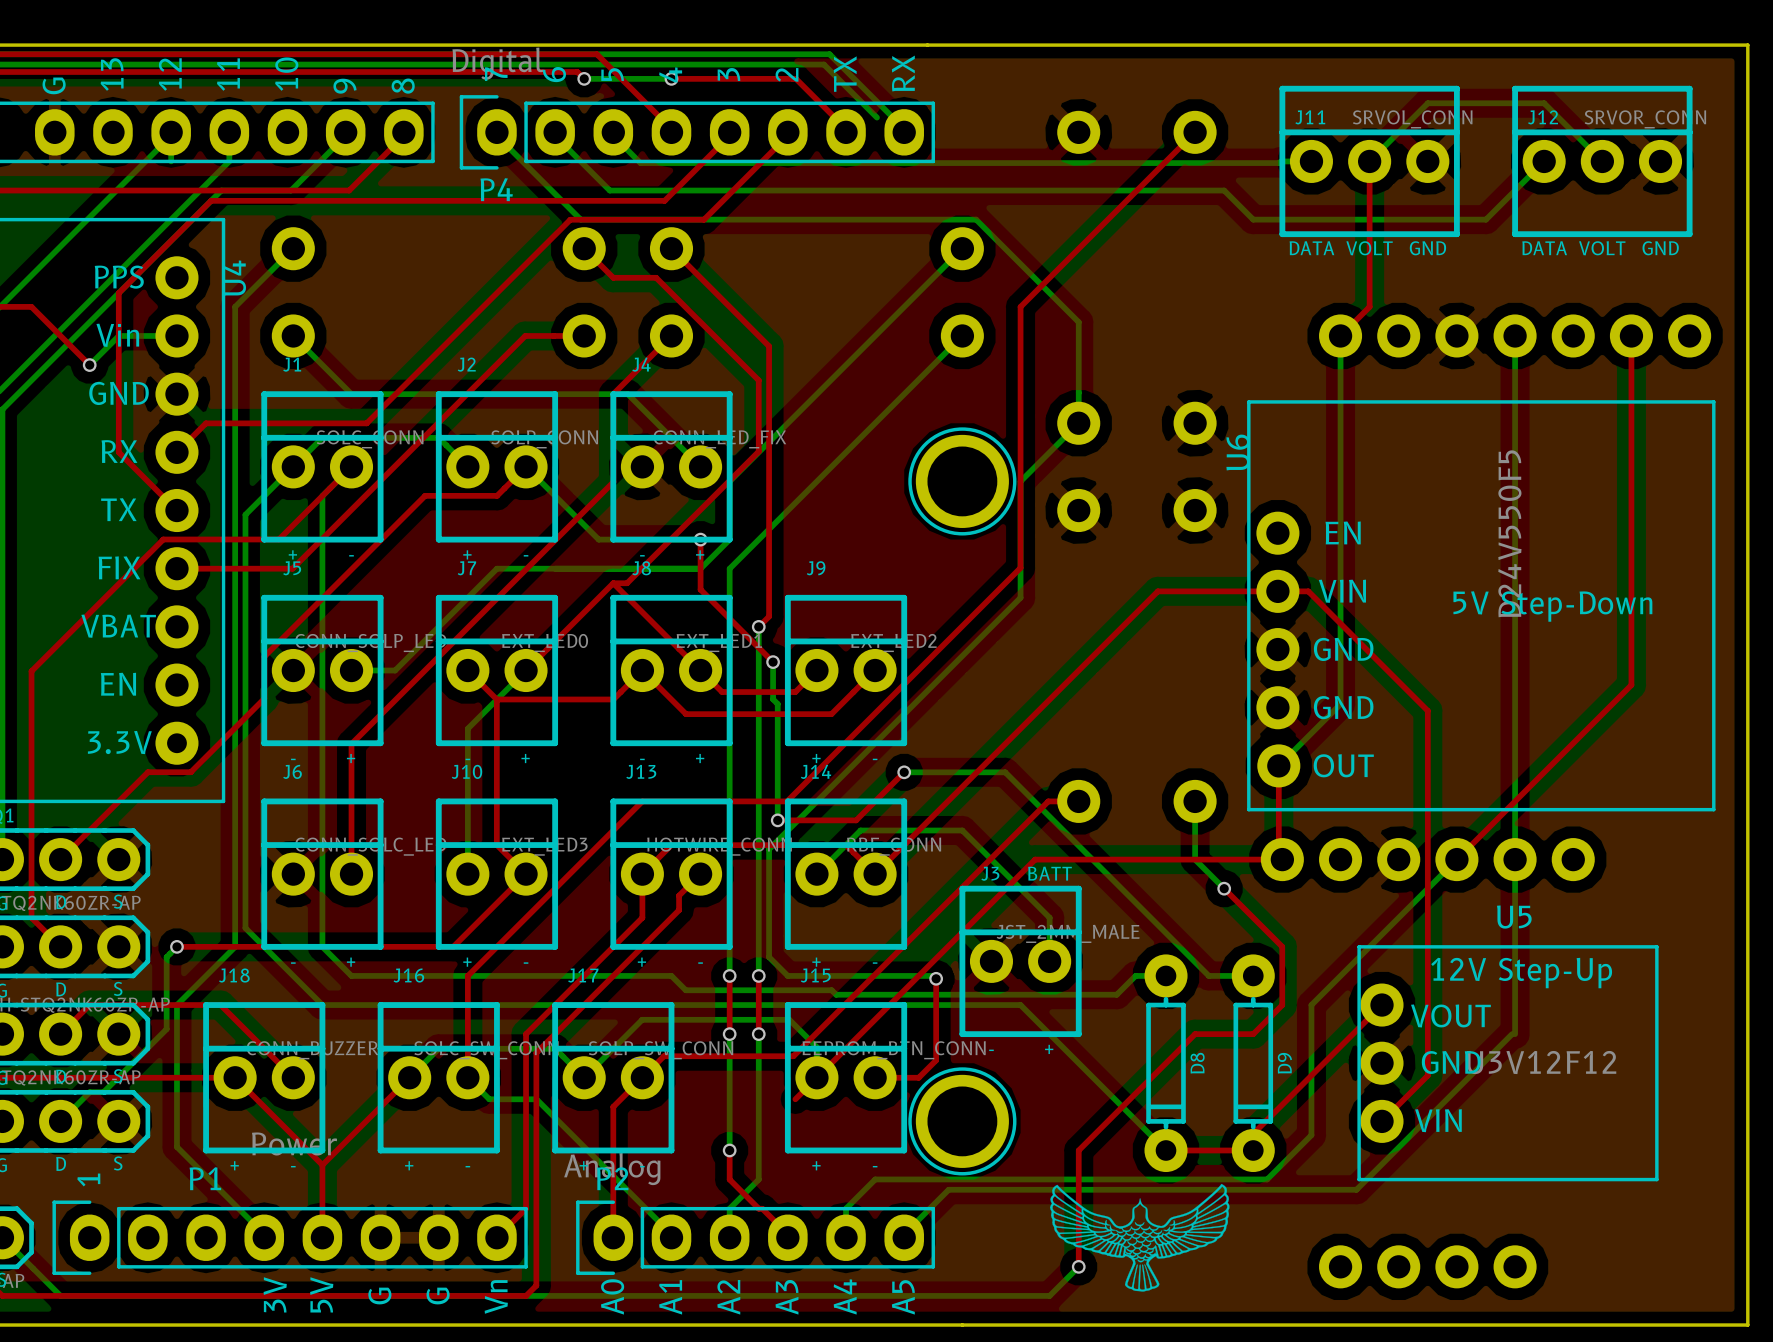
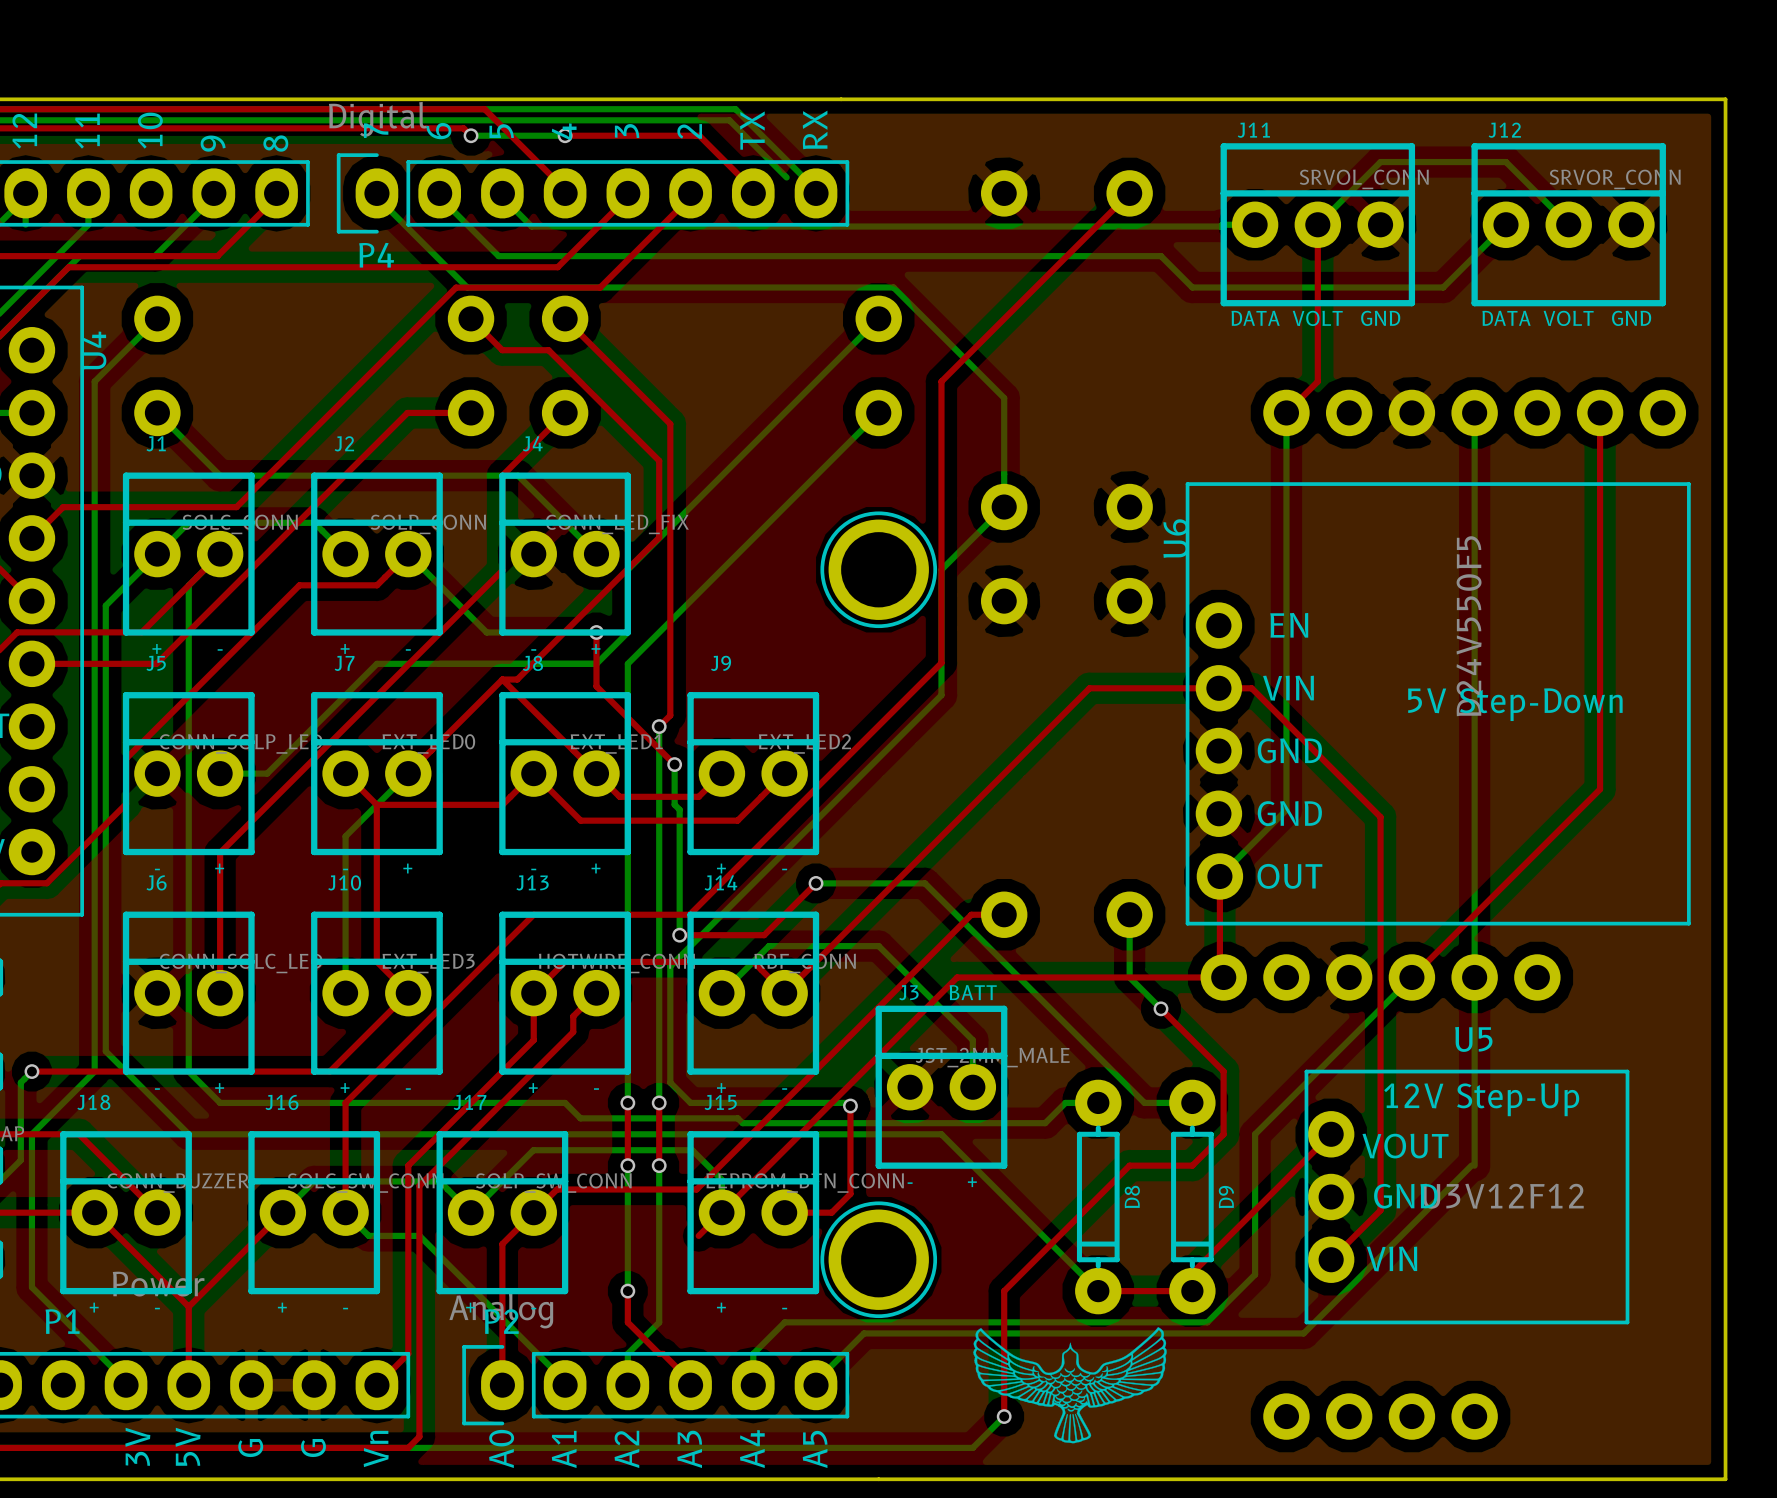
J11 name position: J11 (1310, 117) -> J11 (1253, 130)
J12 name position: J12 (1543, 117) -> J12 (1504, 130)

